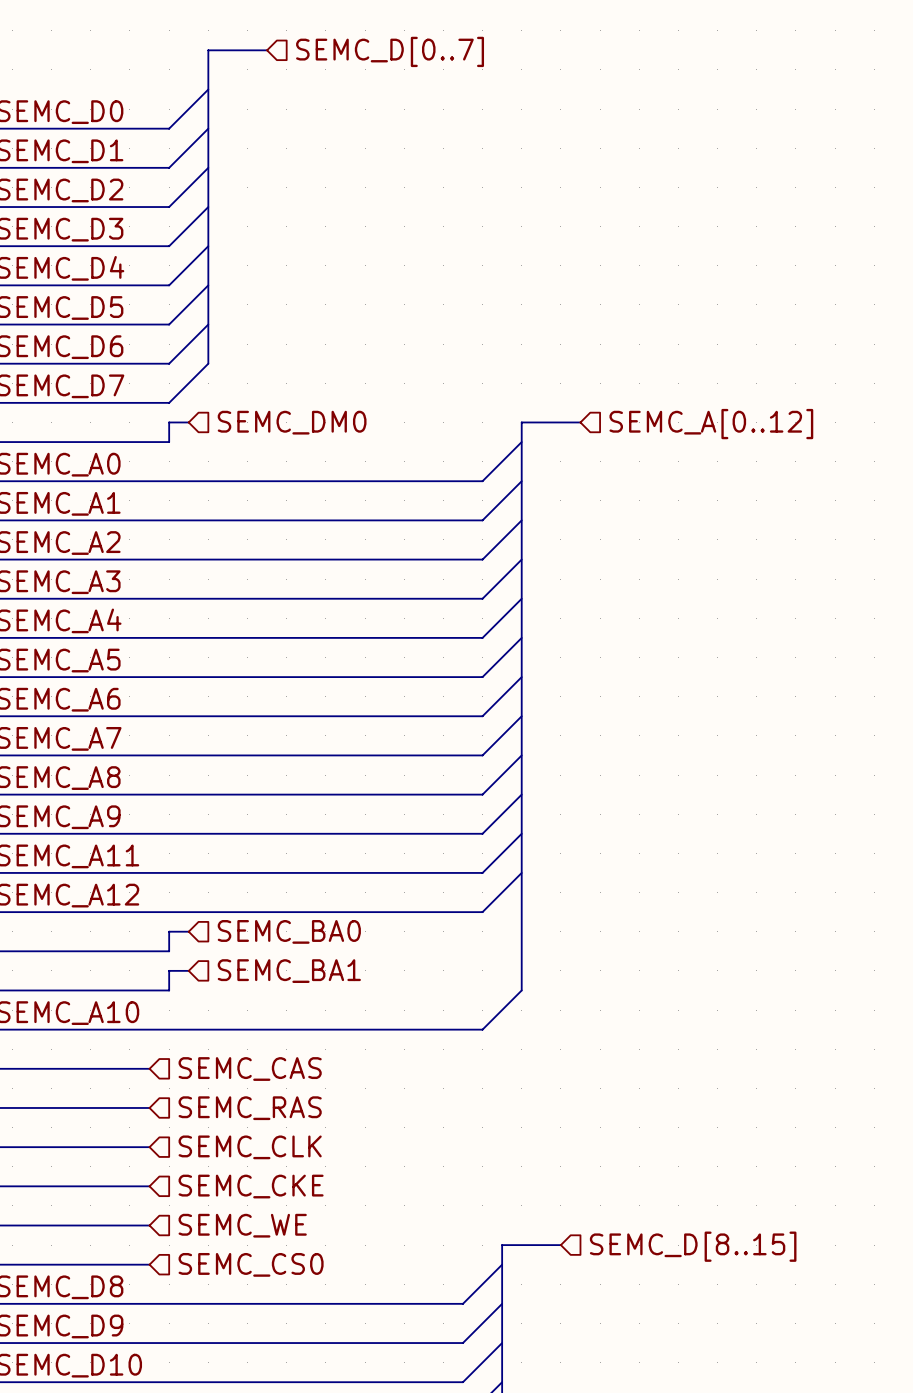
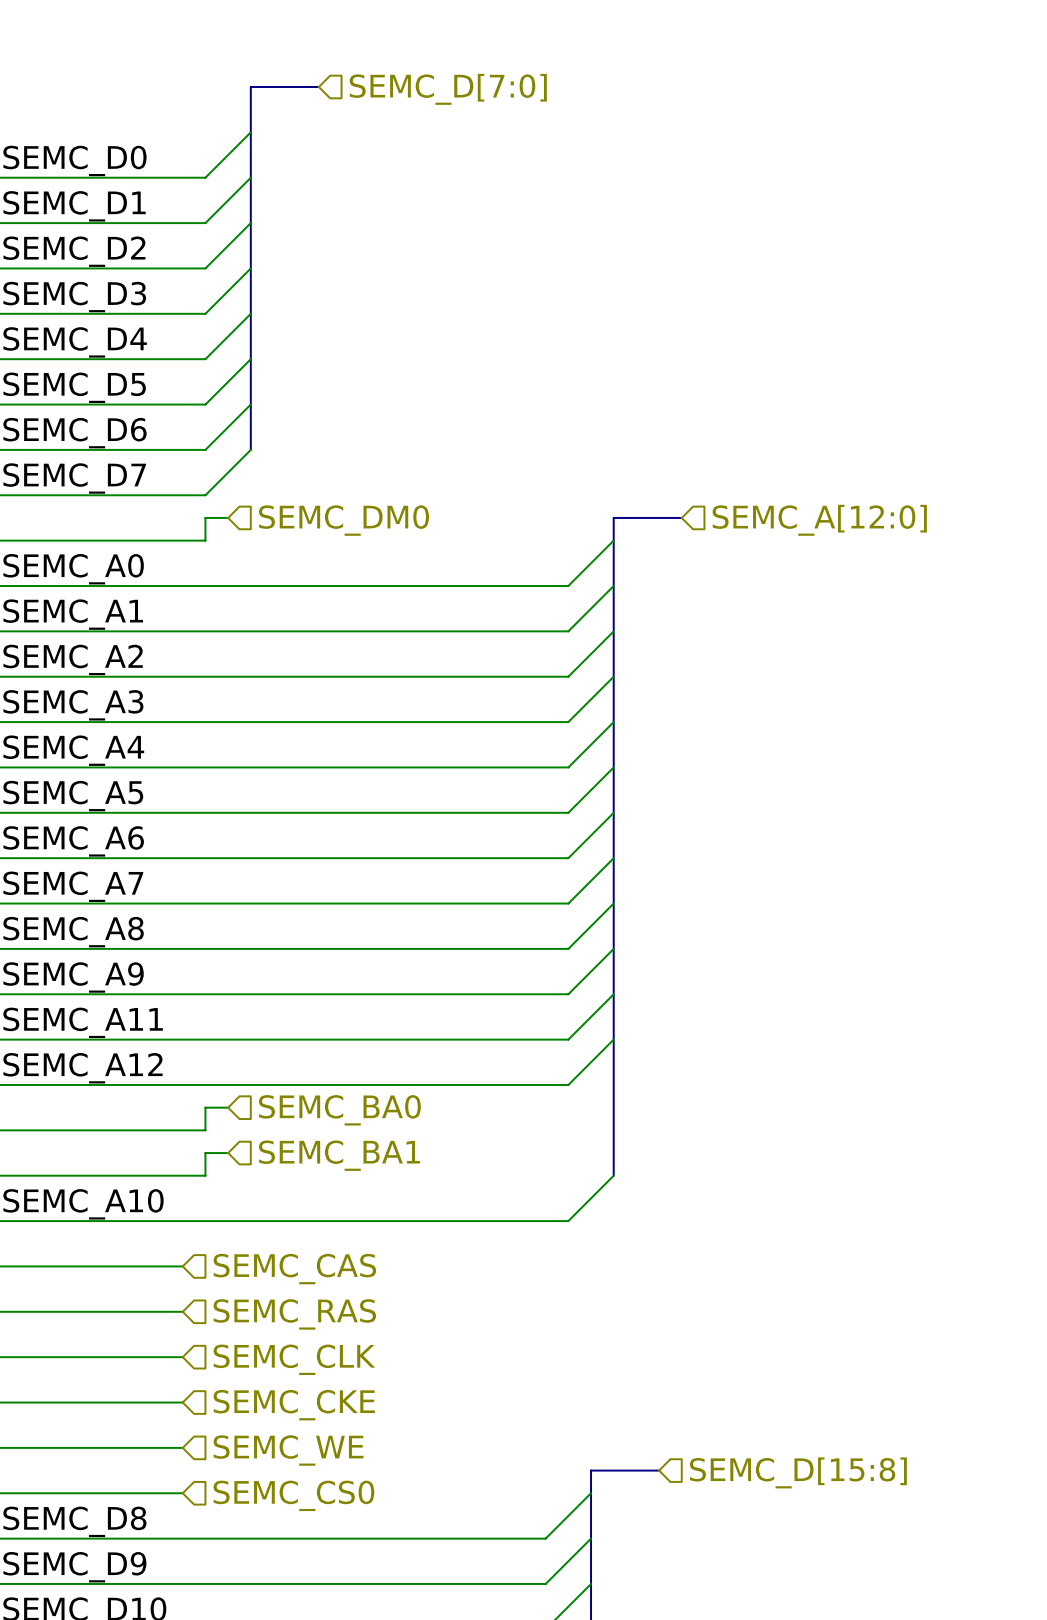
hierarchical label: SEMC_D[0..7] (390, 51) -> SEMC_D[7:0] (448, 89)
hierarchical label: SEMC_A[0..12] (711, 424) -> SEMC_A[12:0] (819, 520)
hierarchical label: SEMC_D[8..15] (693, 1246) -> SEMC_D[15:8] (798, 1472)

